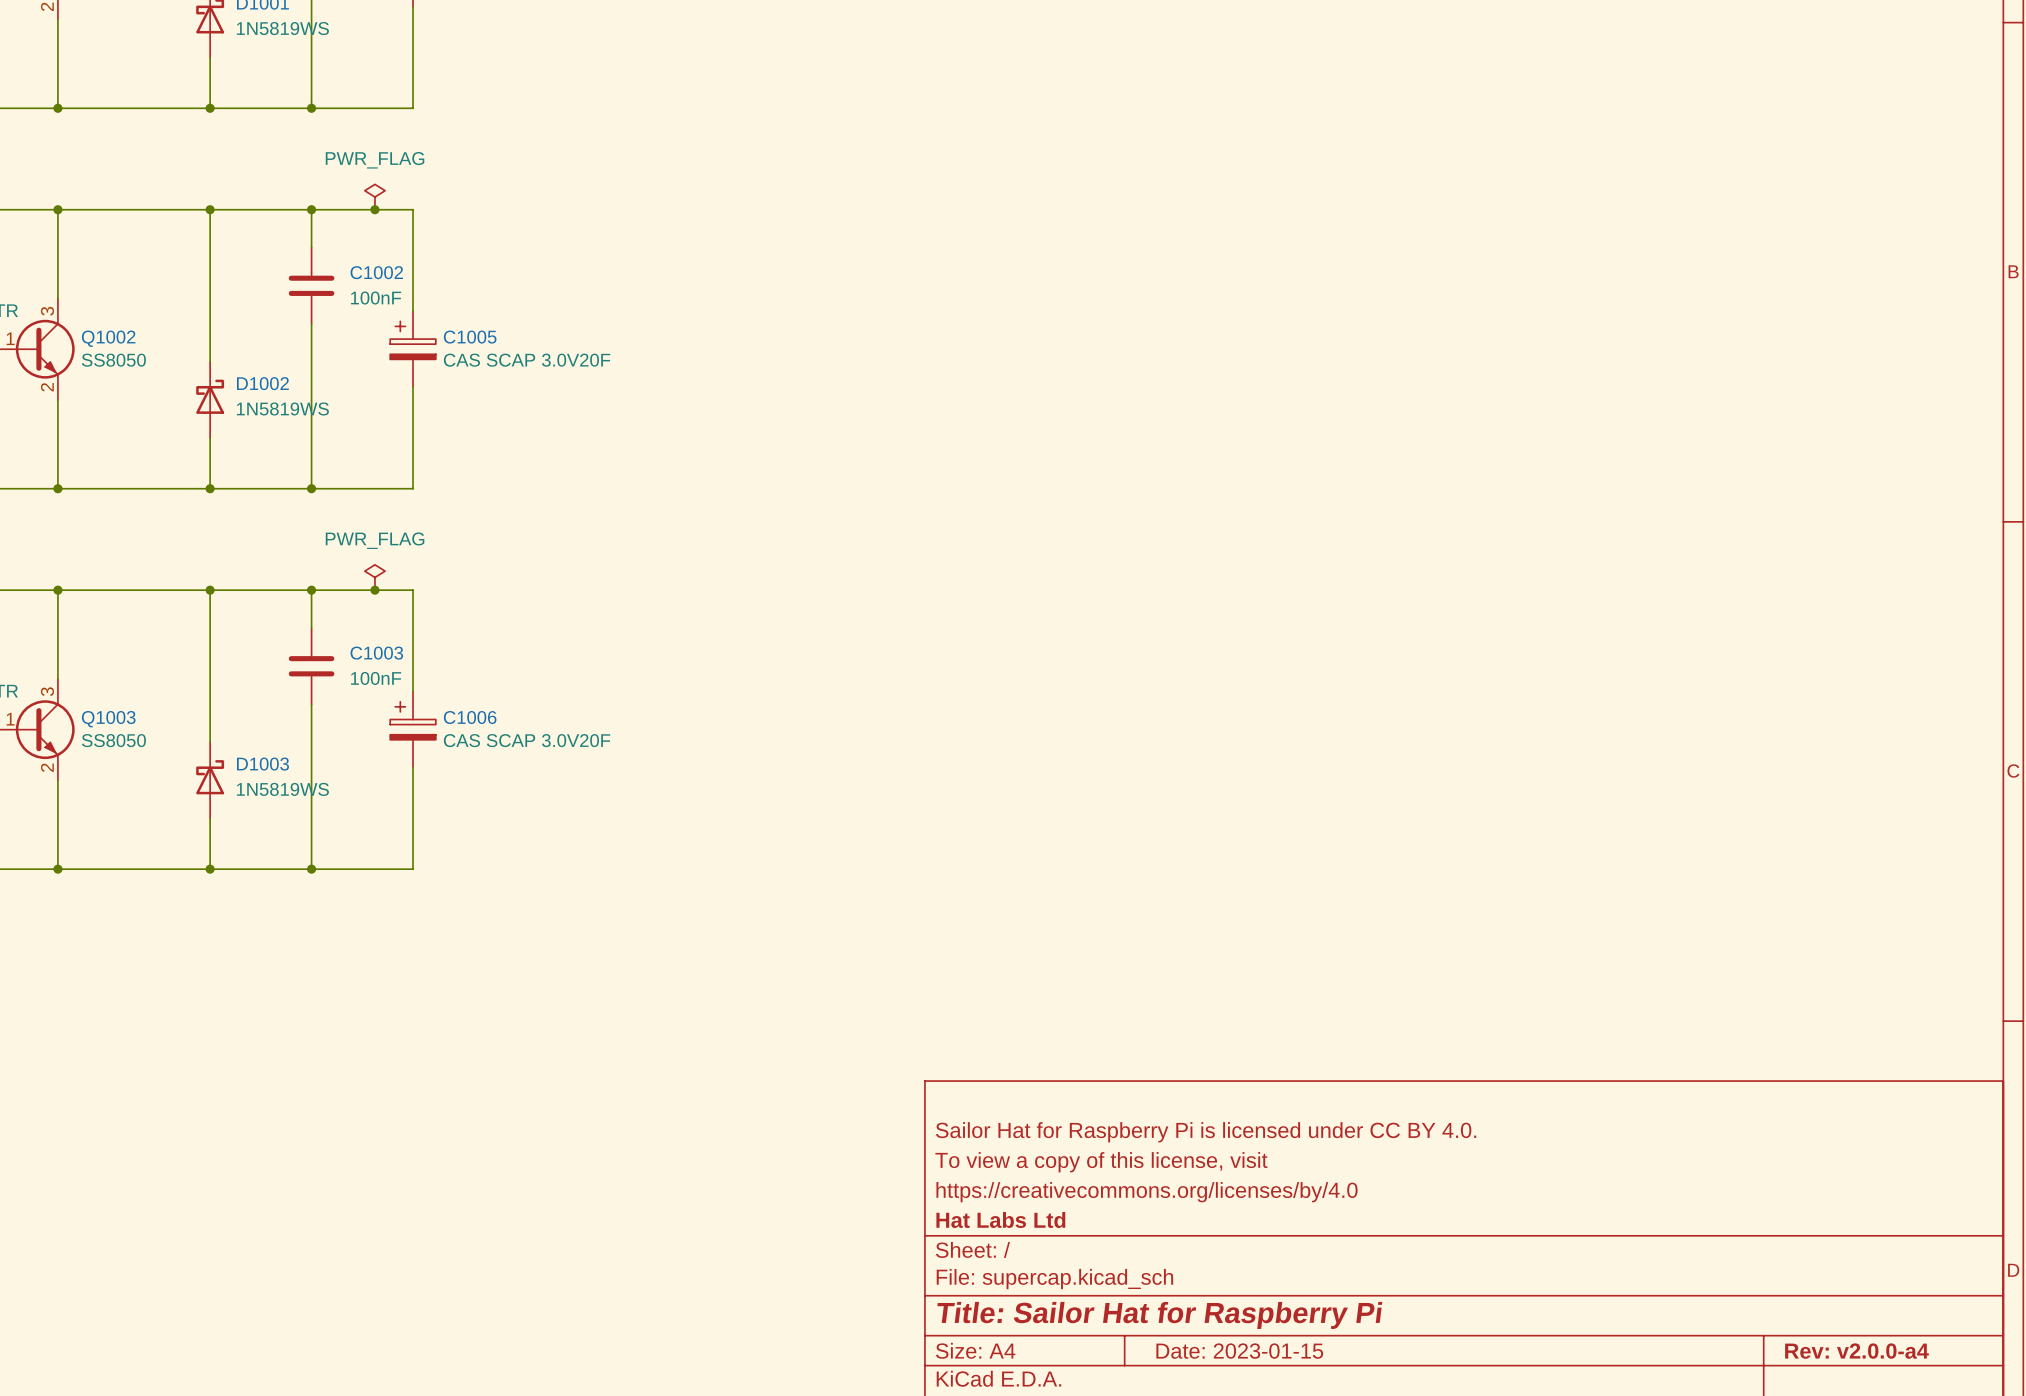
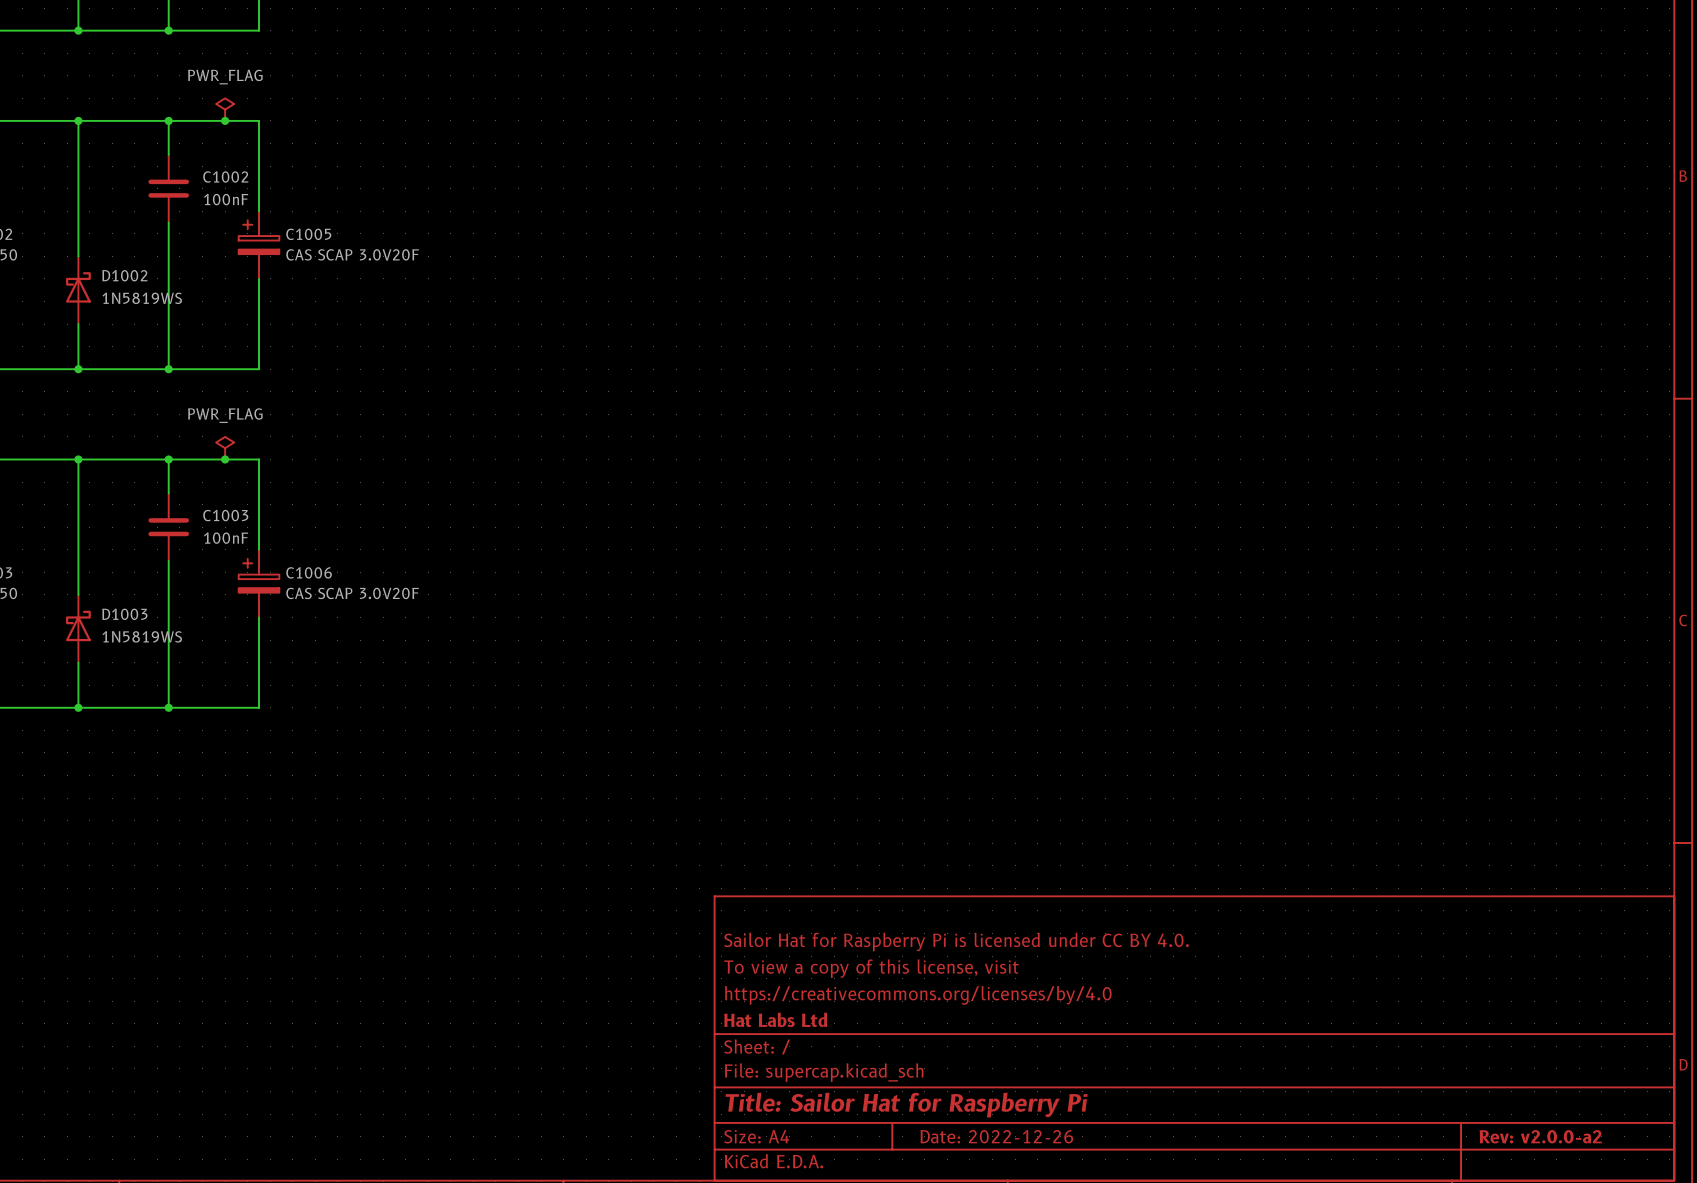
title block: Date: 2023-01-15 (1239, 1351) -> Date: 2022-12-26 (996, 1136)
title block: Rev: v2.0.0-a4 (1856, 1351) -> Rev: v2.0.0-a2 (1540, 1136)

